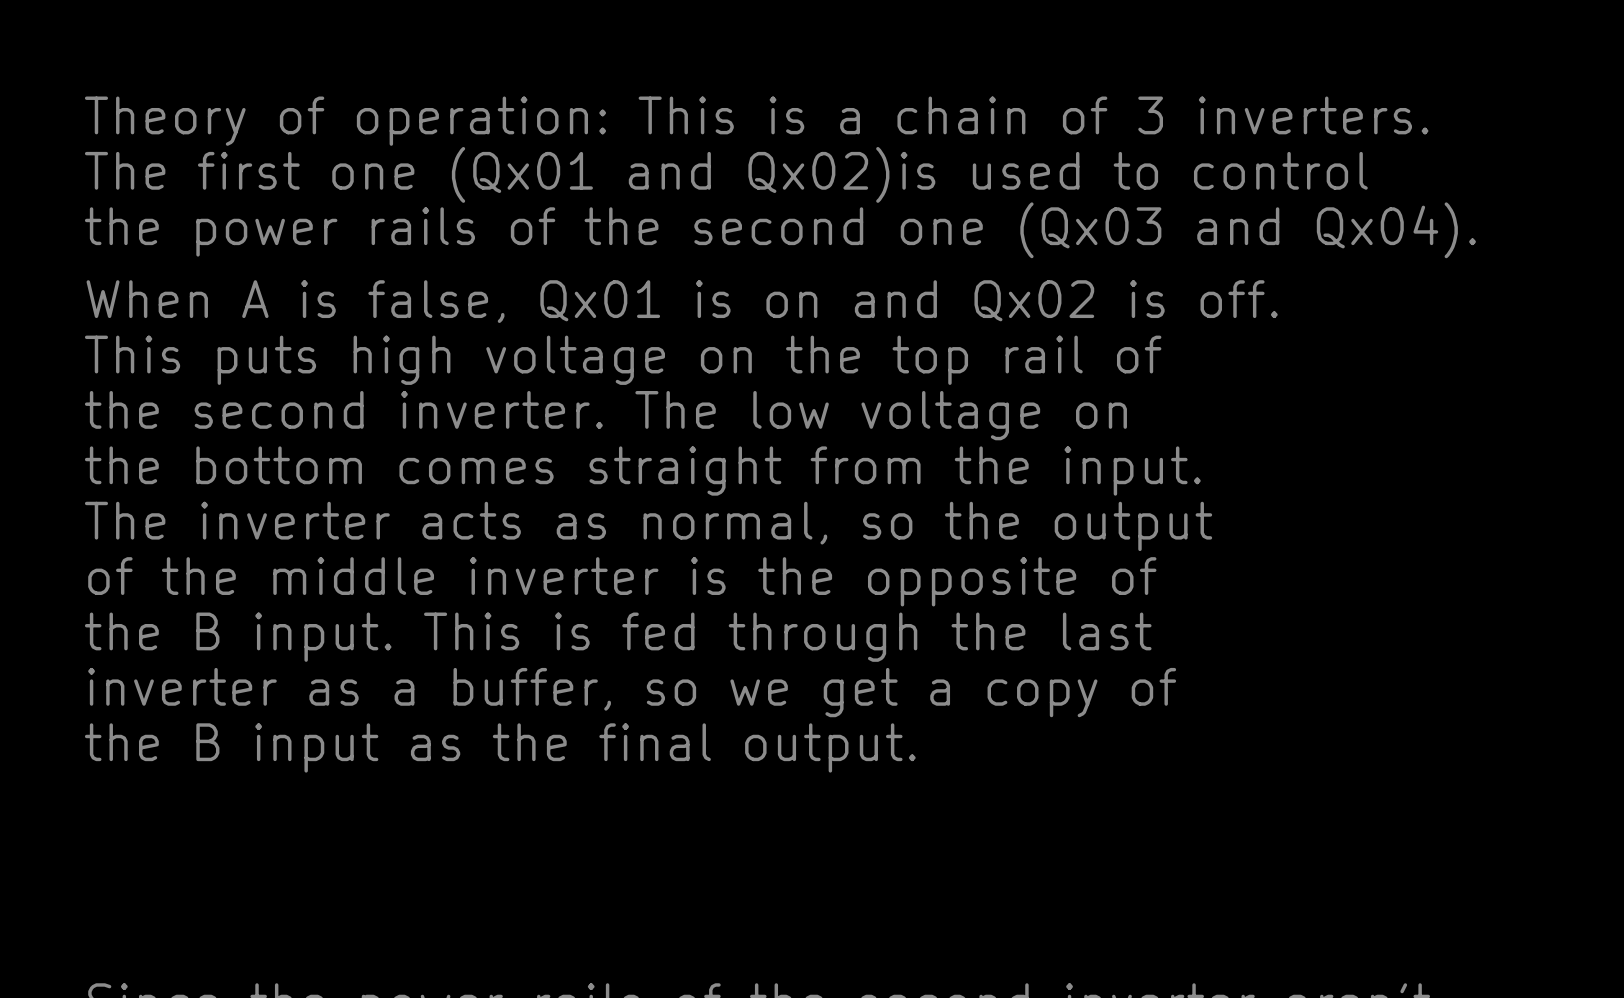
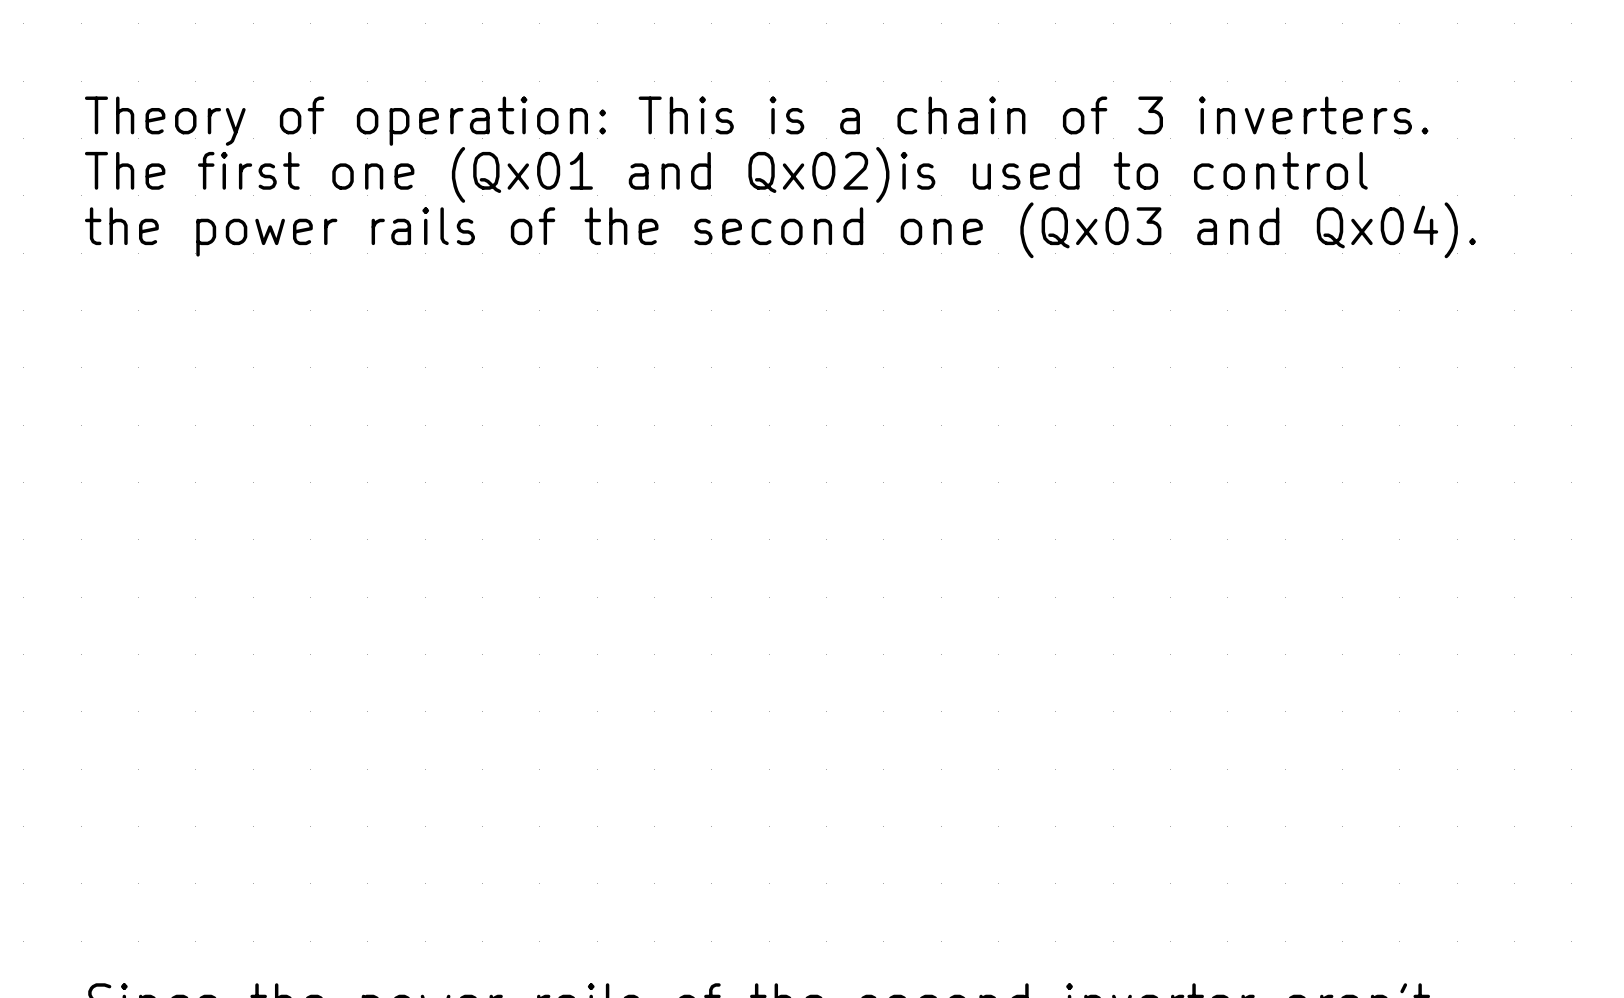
text: When A is false, Qx01 is on and Qx02 is off. (682, 301) -> none
text: This puts high voltage on the top rail of (623, 360) -> none
text: the second inverter. The low voltage on (605, 415) -> none
text: the bottom comes straight from the input. (642, 471) -> none
text: The inverter acts as normal, so the output (648, 526) -> none
text: of the middle inverter is the opposite of (622, 581) -> none
text: the B input. This is fed through the last (618, 637) -> none
text: inverter as a buffer, so we get a copy of (632, 692) -> none
text: the B input as the final output. (500, 747) -> none

